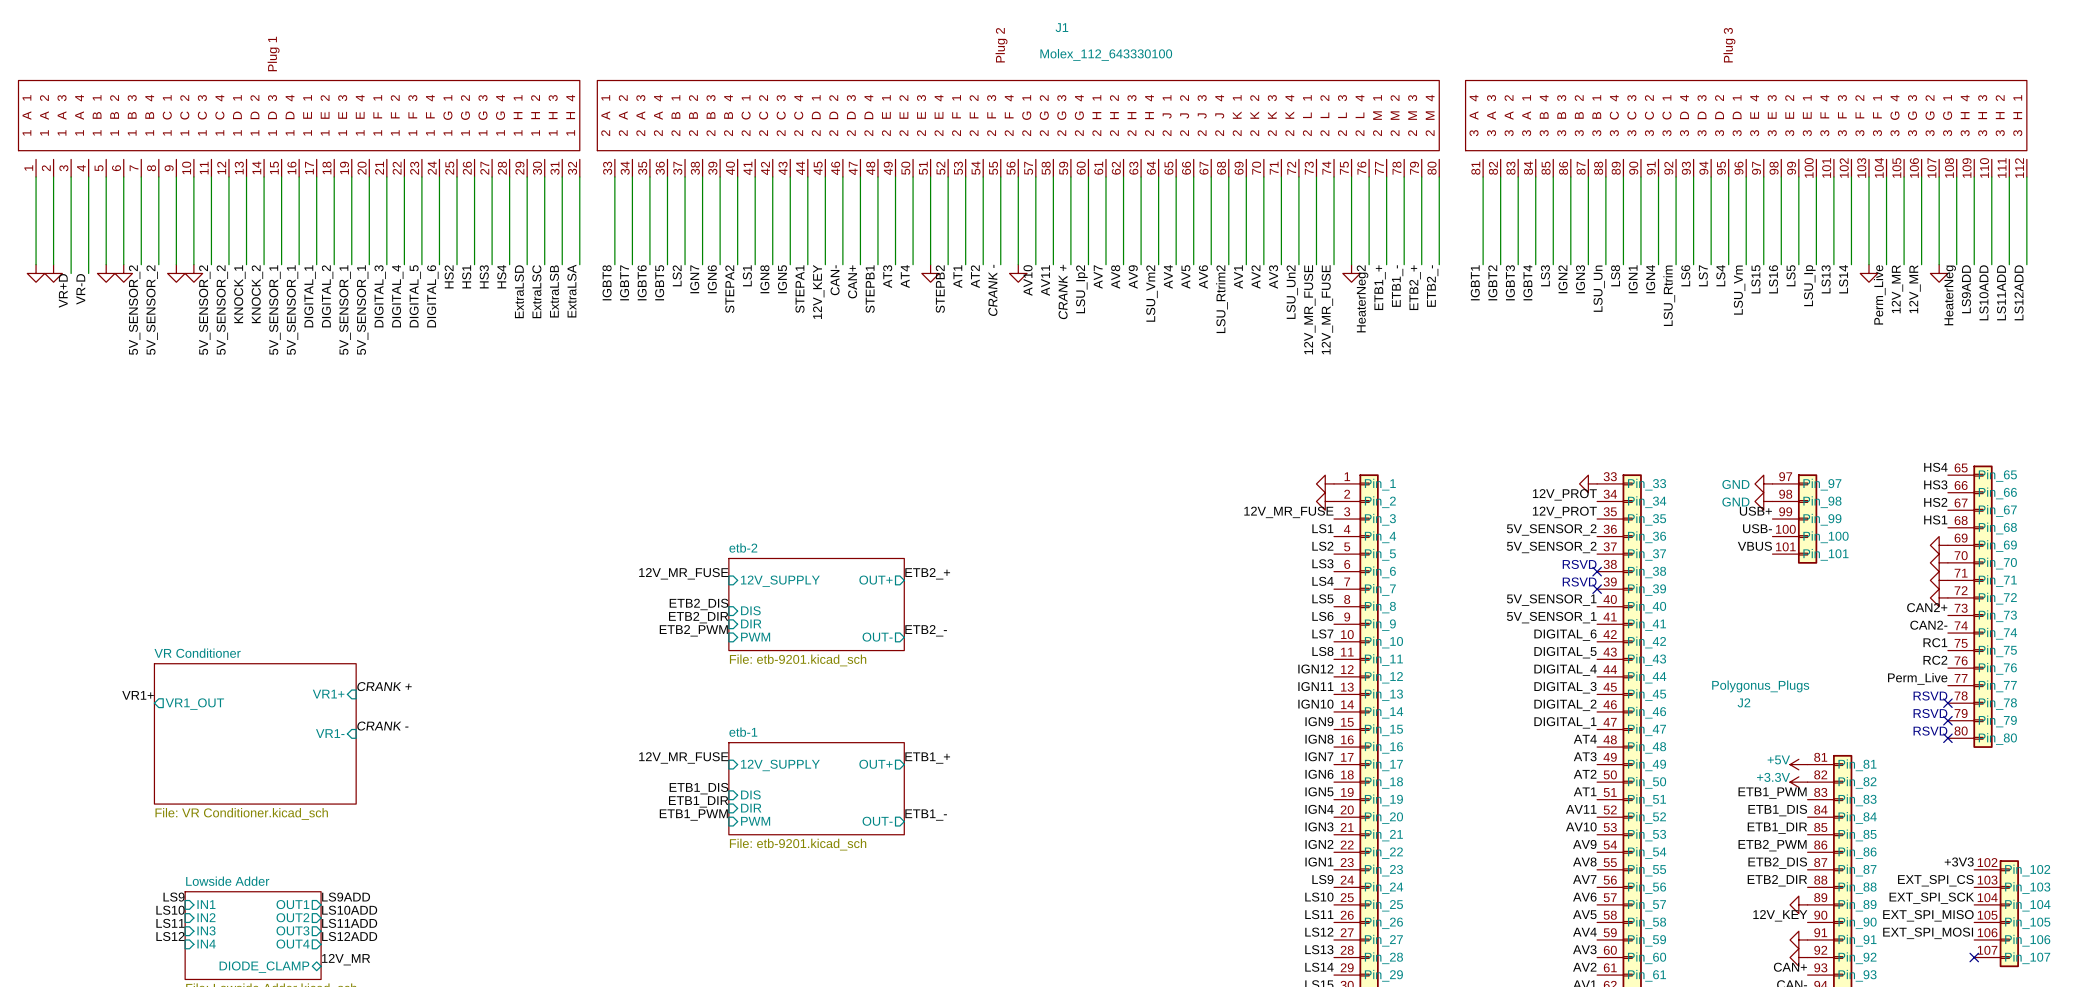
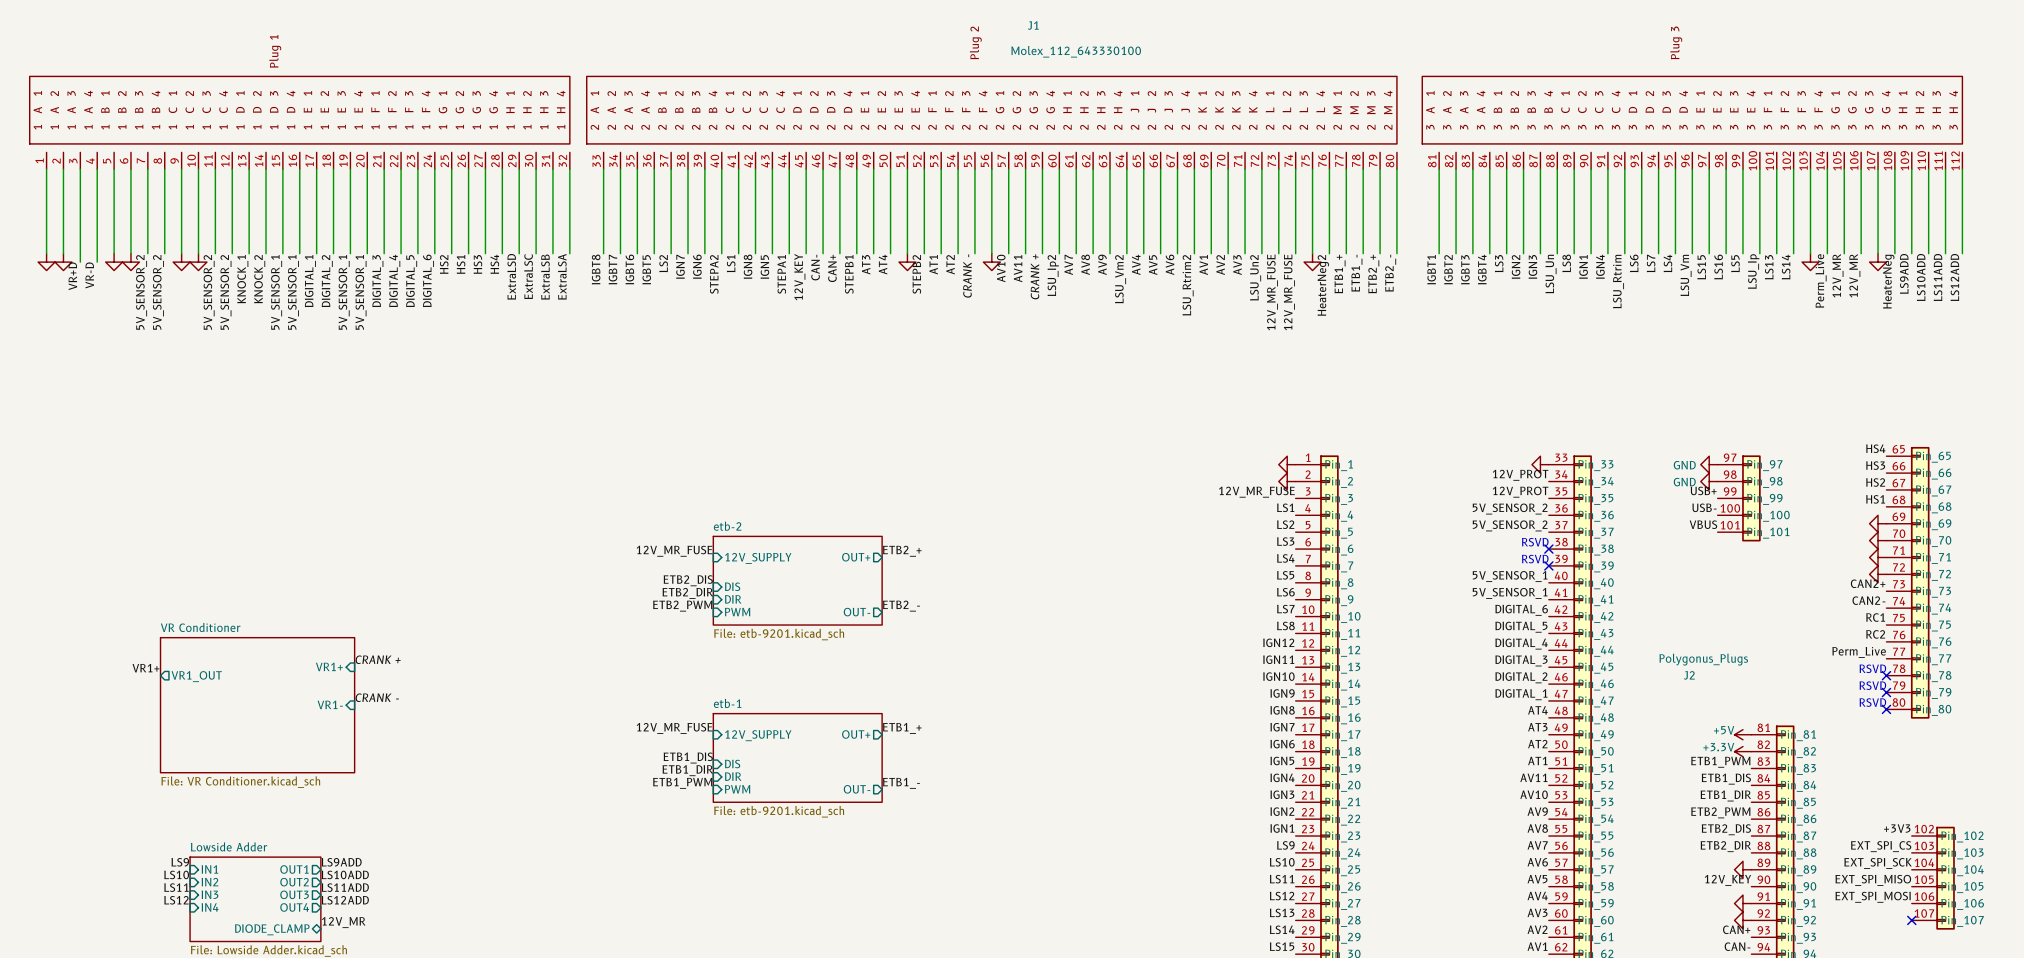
J1 symbol: [18, 80, 2027, 177] -> [29, 76, 1963, 170]

